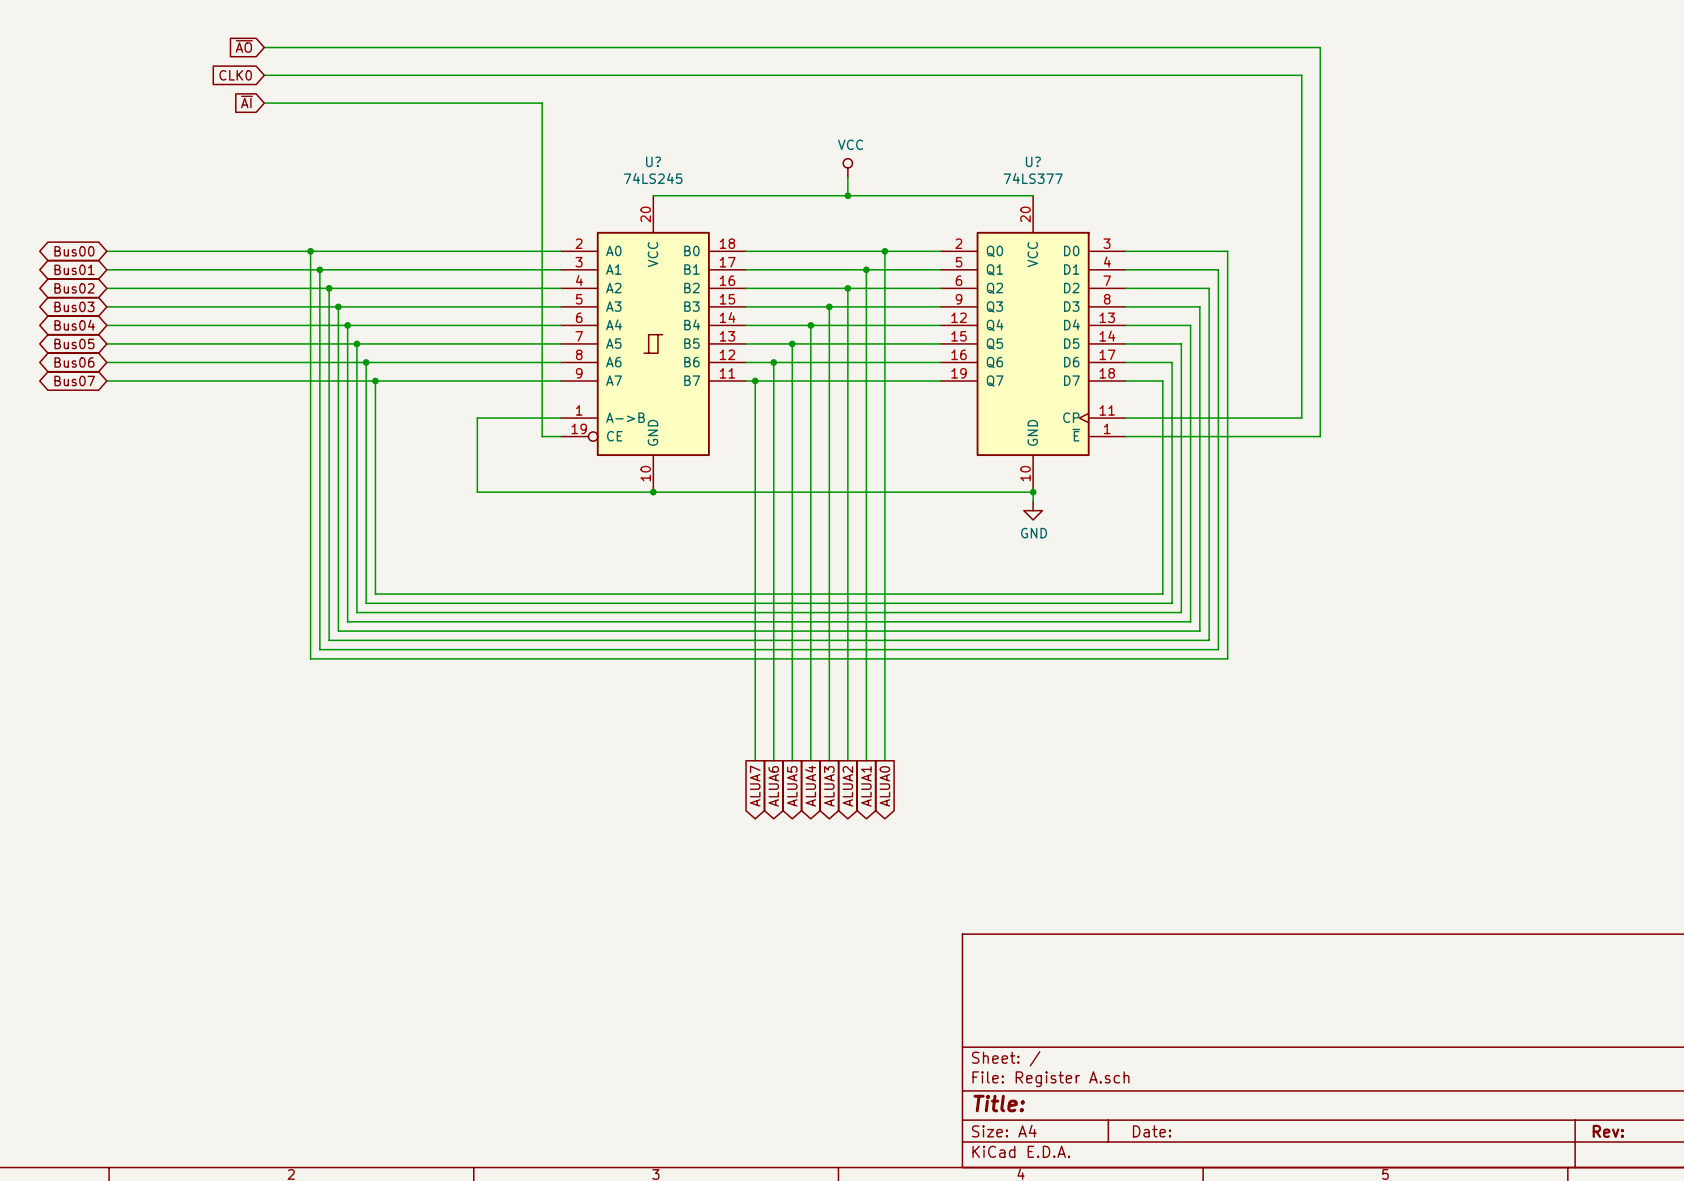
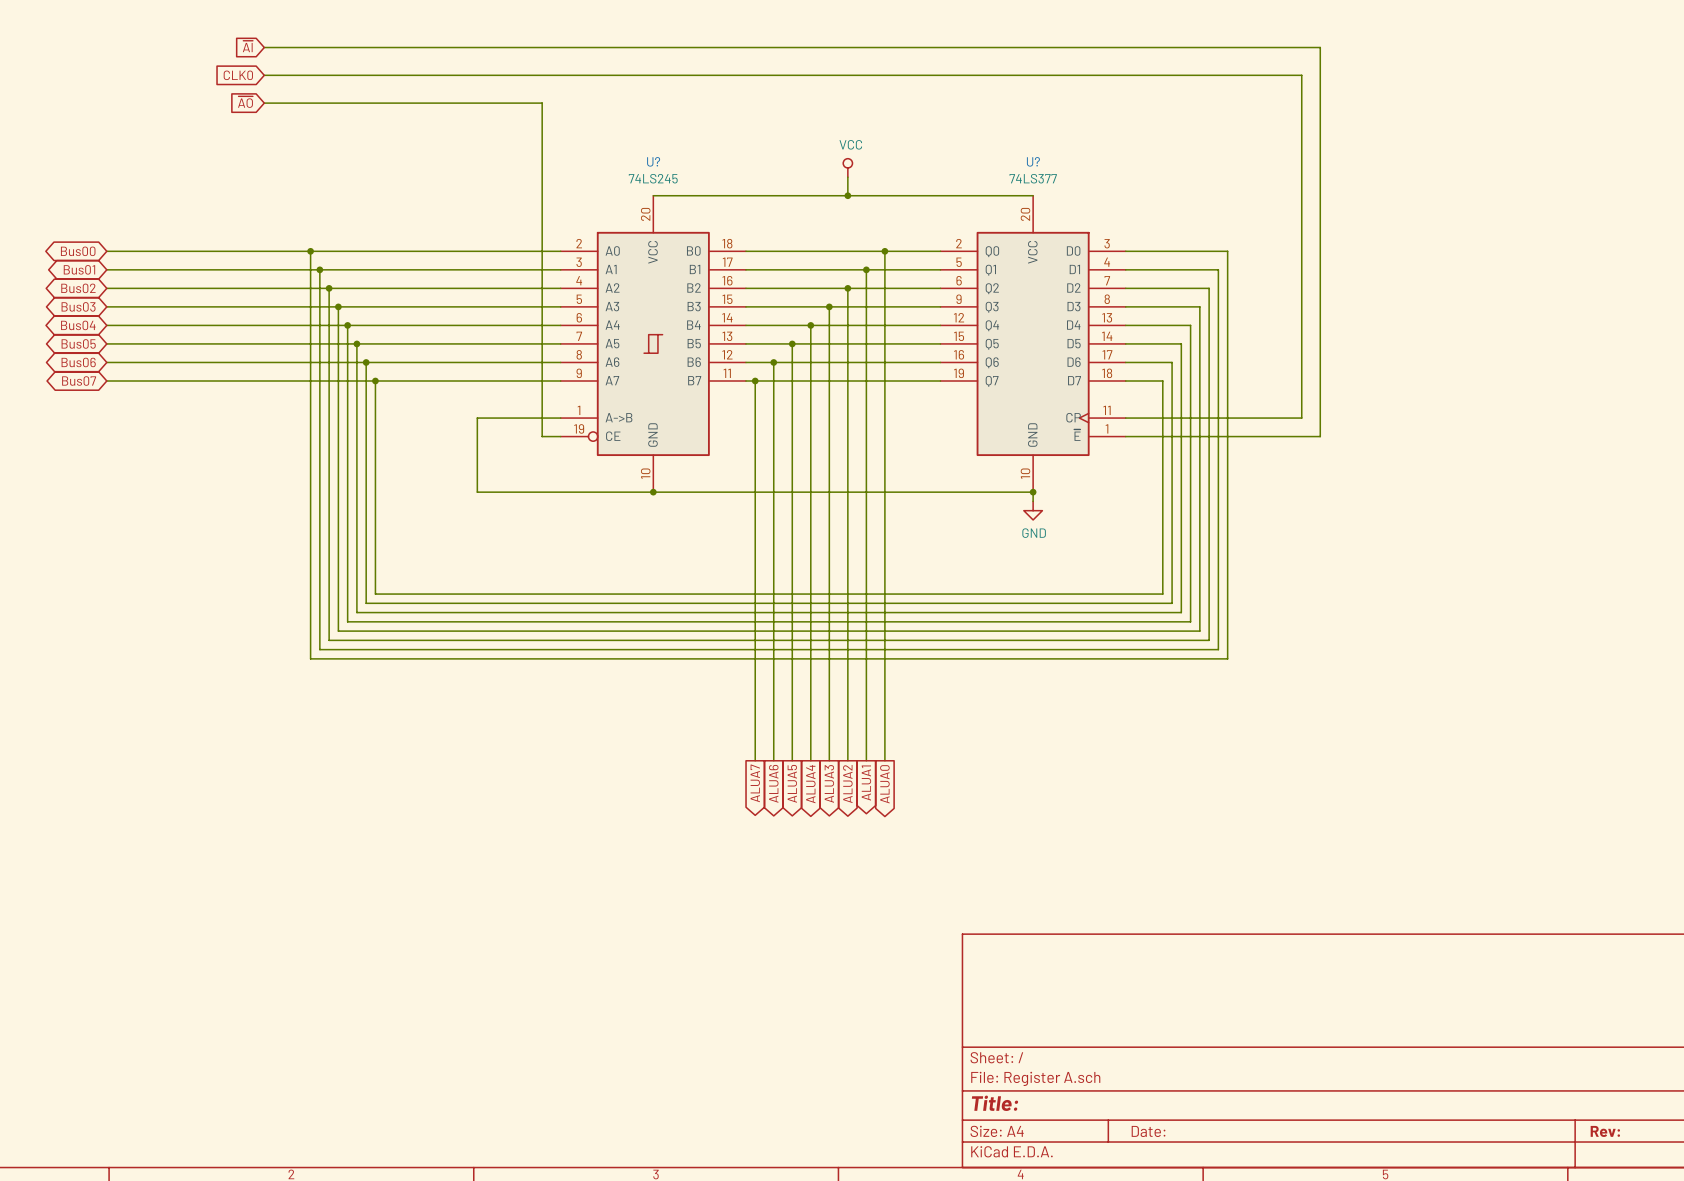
global label: ~{AO} (244, 46) -> ~{AI} (247, 46)
global label: ~{AI} (246, 102) -> ~{AO} (245, 102)

